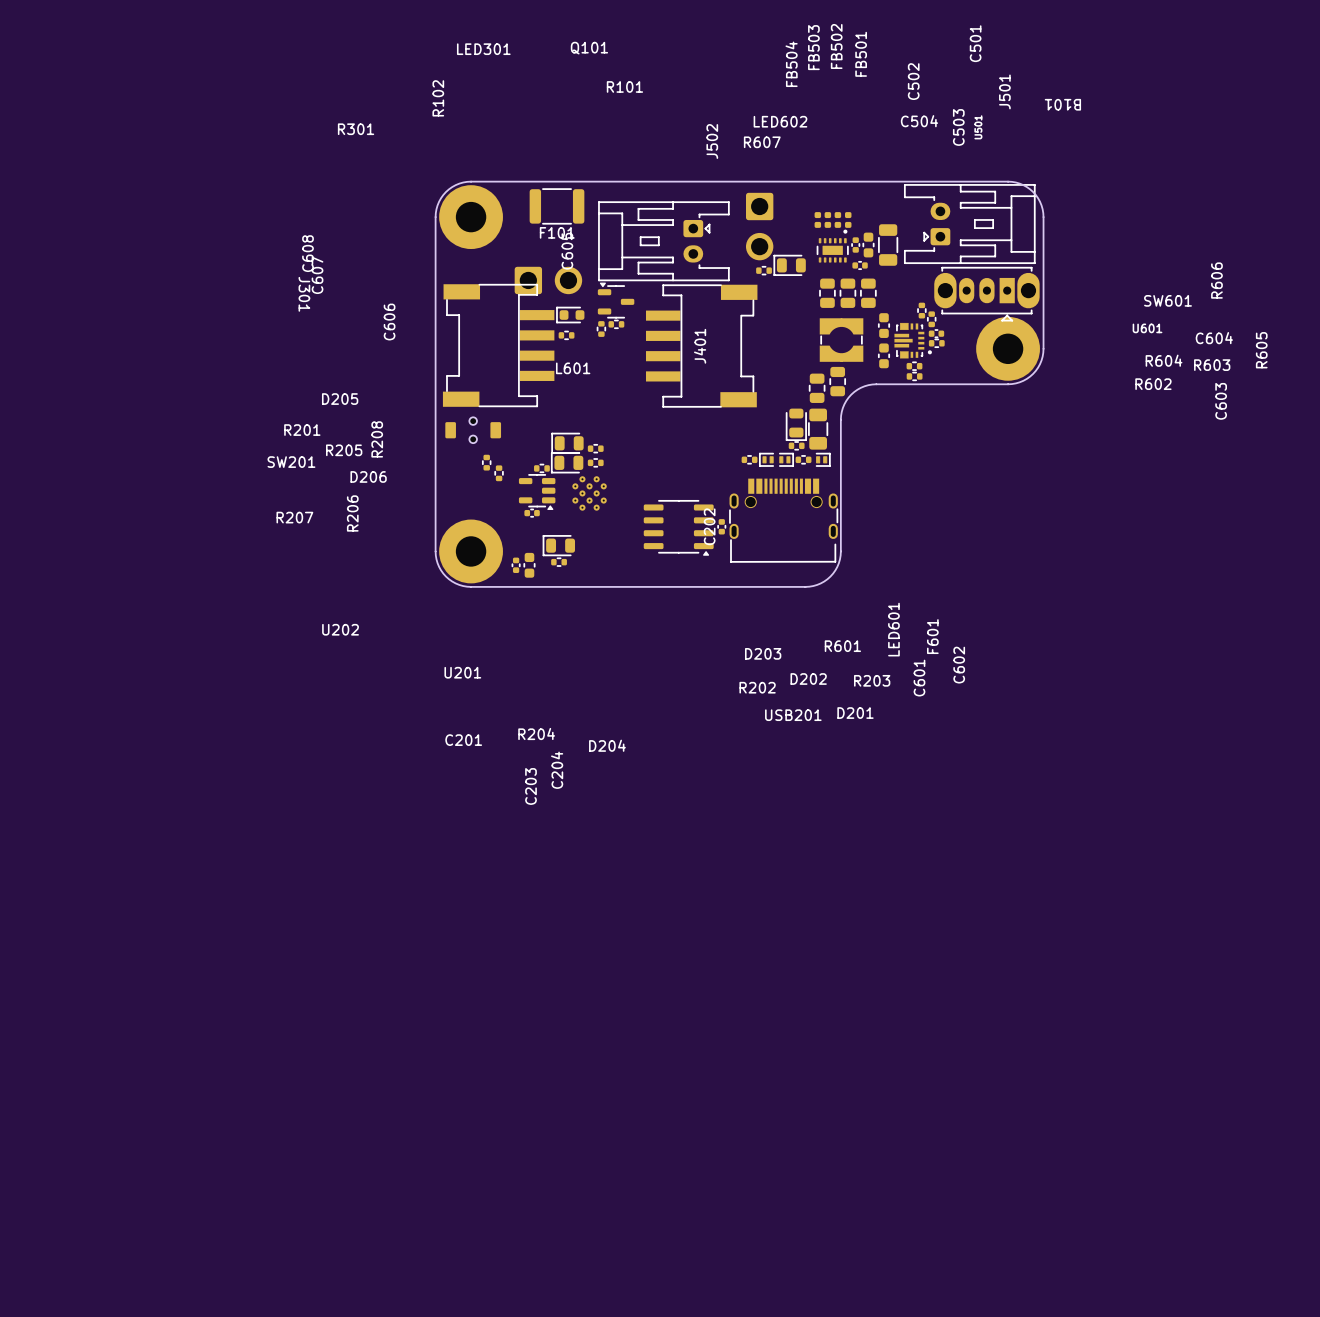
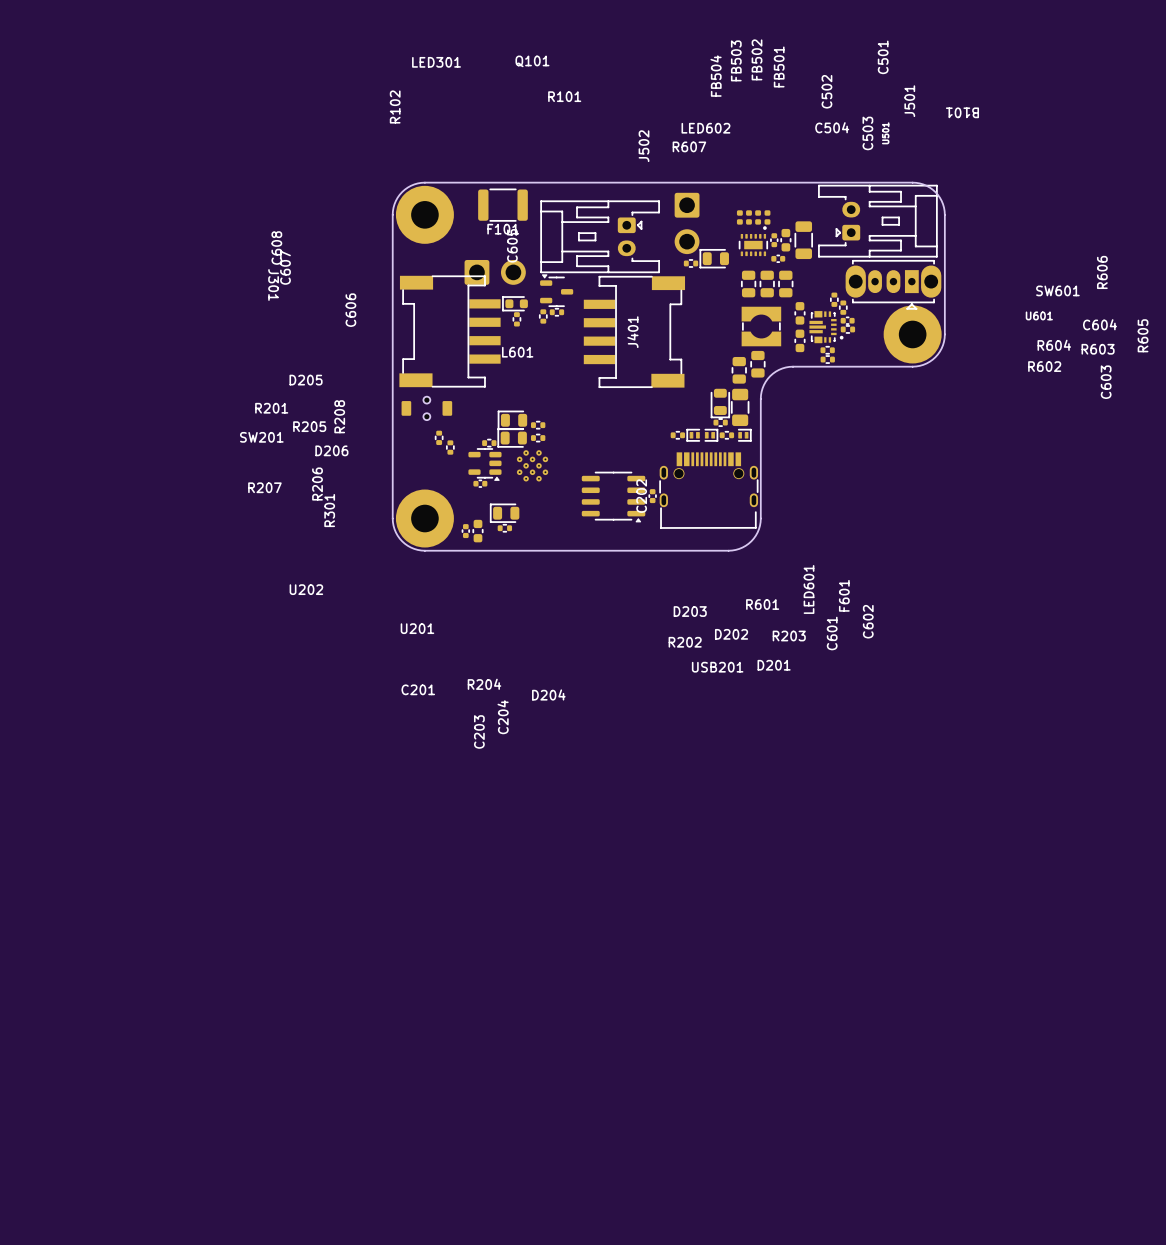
R301 name position: R301 (356, 129) -> R301 (329, 510)
R301 rotation: 0° (566, 335) -> 90° clockwise (516, 319)

